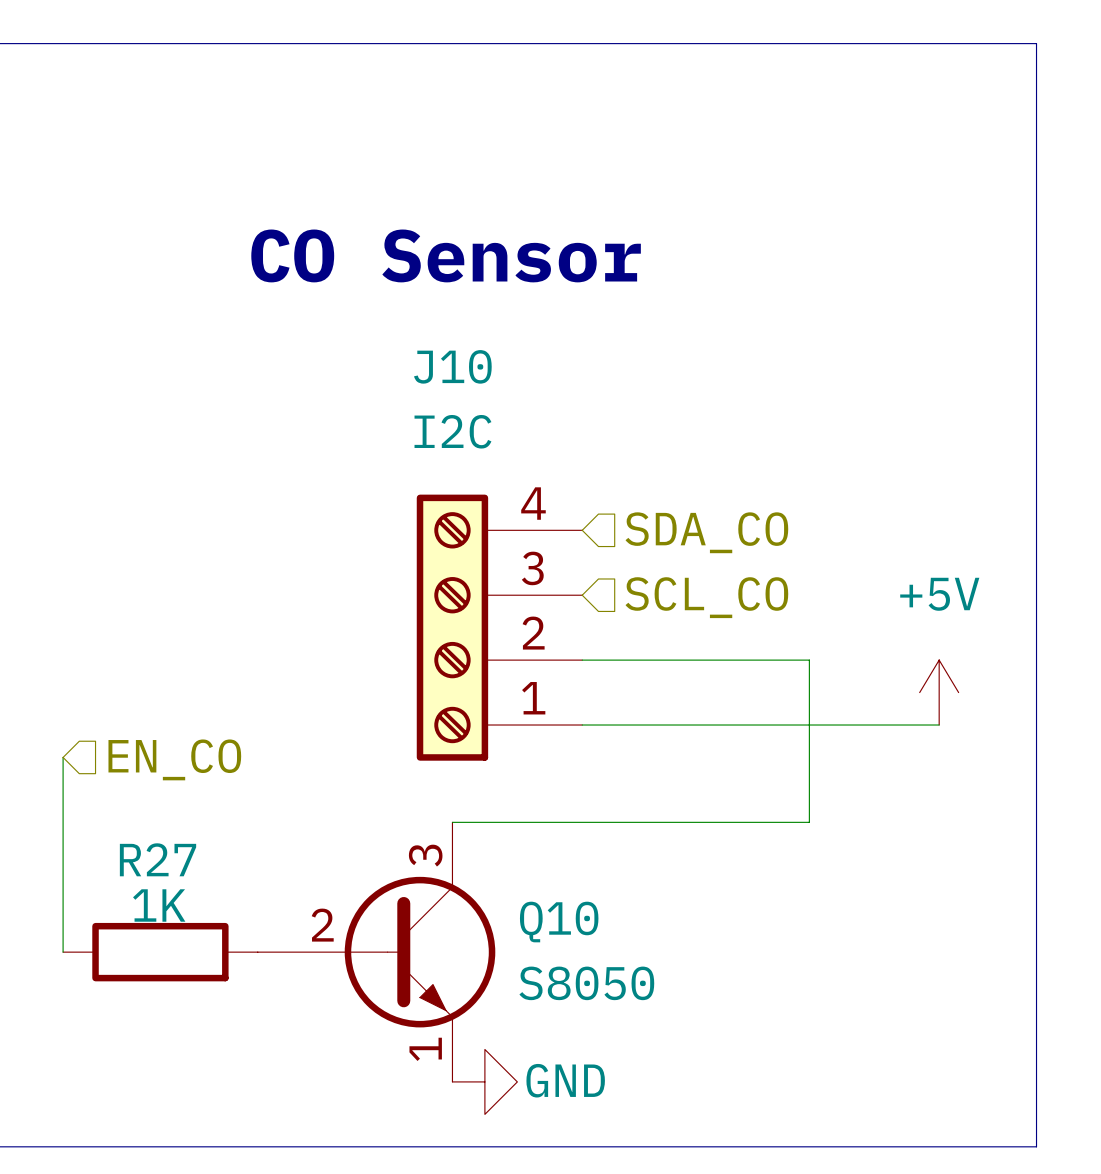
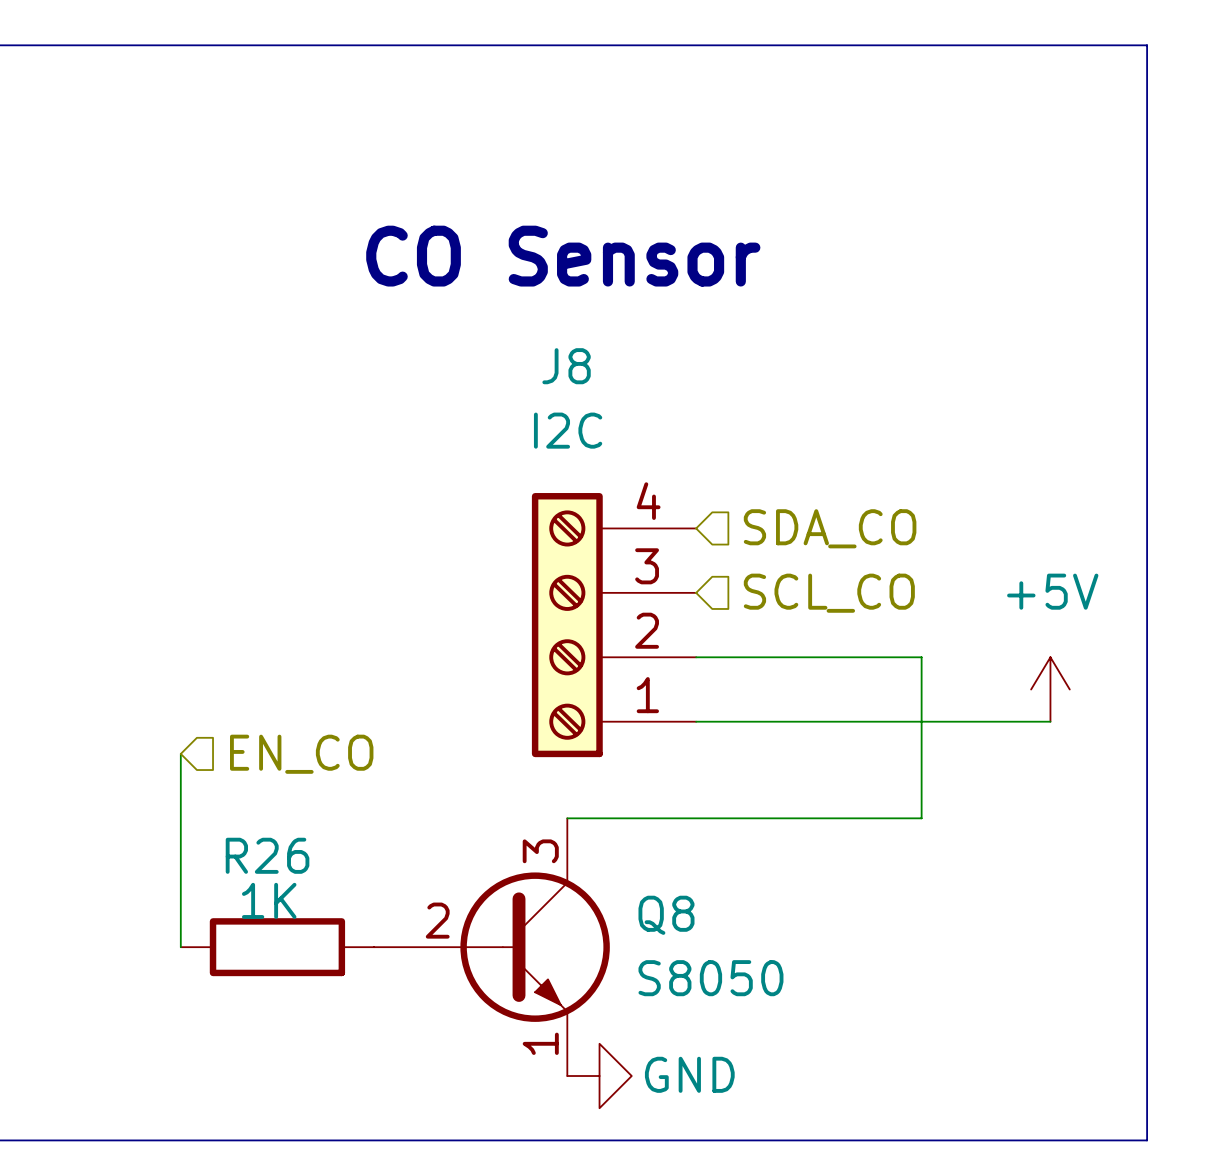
J10 name: J10 (452, 366) -> J8 (566, 366)
R27 name: R27 (158, 859) -> R26 (267, 855)
Q10 name: Q10 (559, 922) -> Q8 (666, 915)

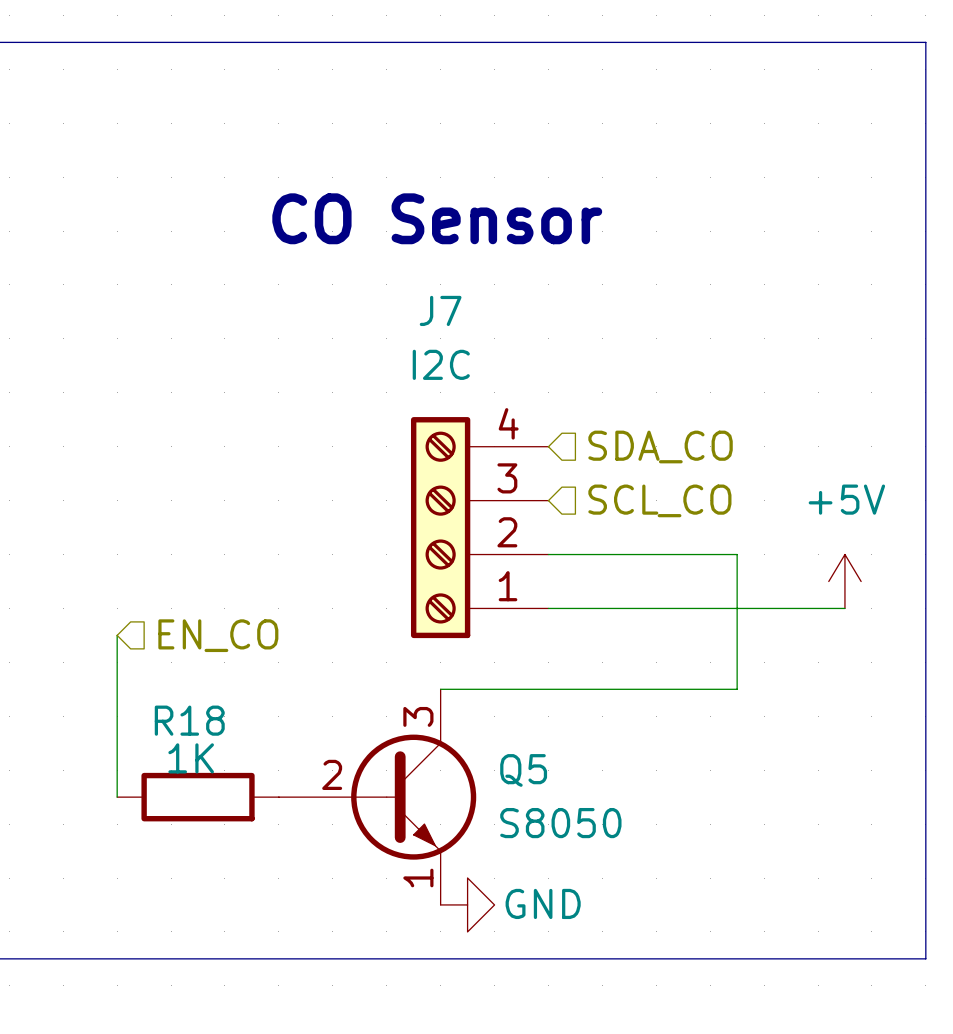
J8 name: J8 (566, 366) -> J7 (440, 310)
R26 name: R26 (267, 855) -> R18 (189, 720)
Q8 name: Q8 (666, 915) -> Q5 (523, 770)

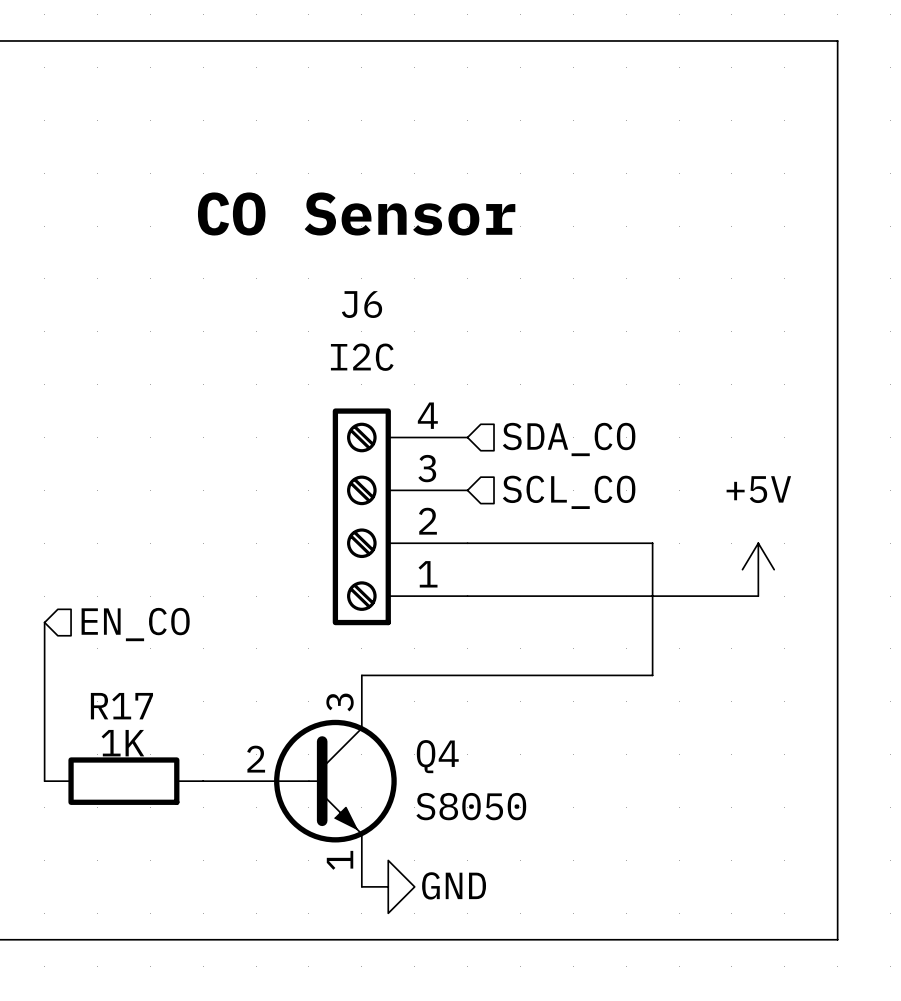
J7 name: J7 (440, 310) -> J6 (362, 304)
R18 name: R18 (189, 720) -> R17 (121, 706)
Q5 name: Q5 (523, 770) -> Q4 (437, 756)

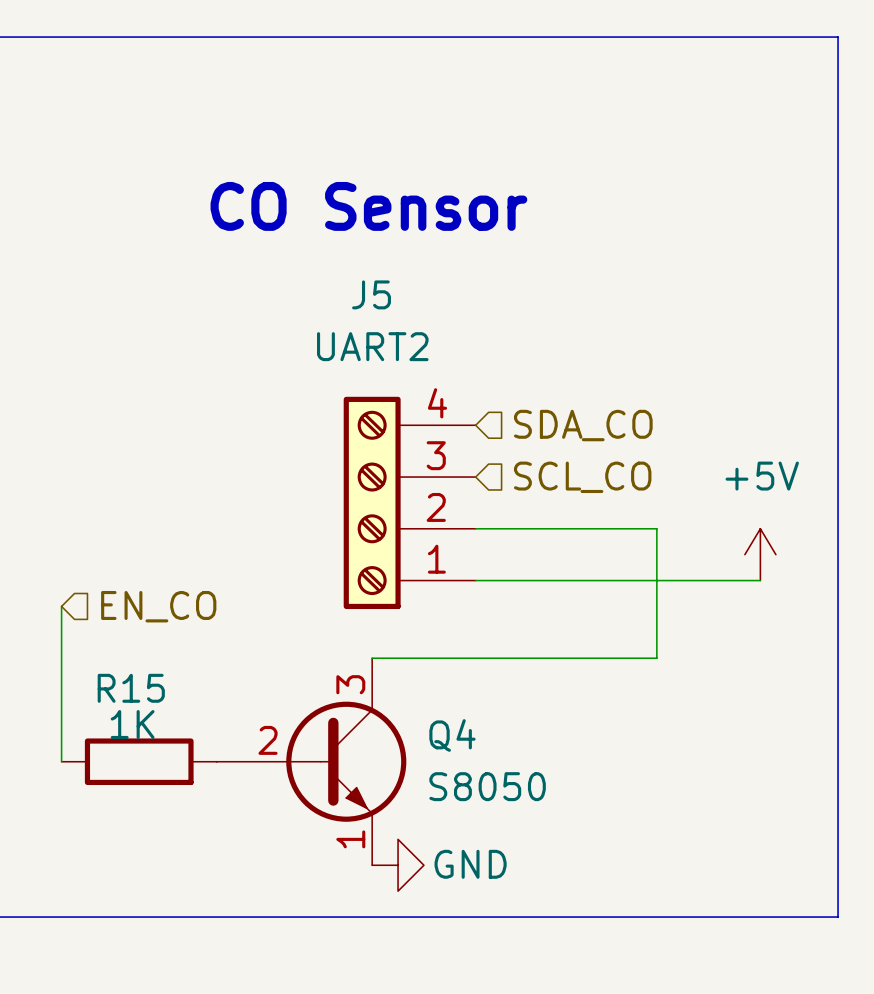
J6 name: J6 (362, 304) -> J5 (371, 294)
J6 value: I2C (362, 357) -> UART2 (372, 346)
R17 name: R17 (121, 706) -> R15 (131, 688)

